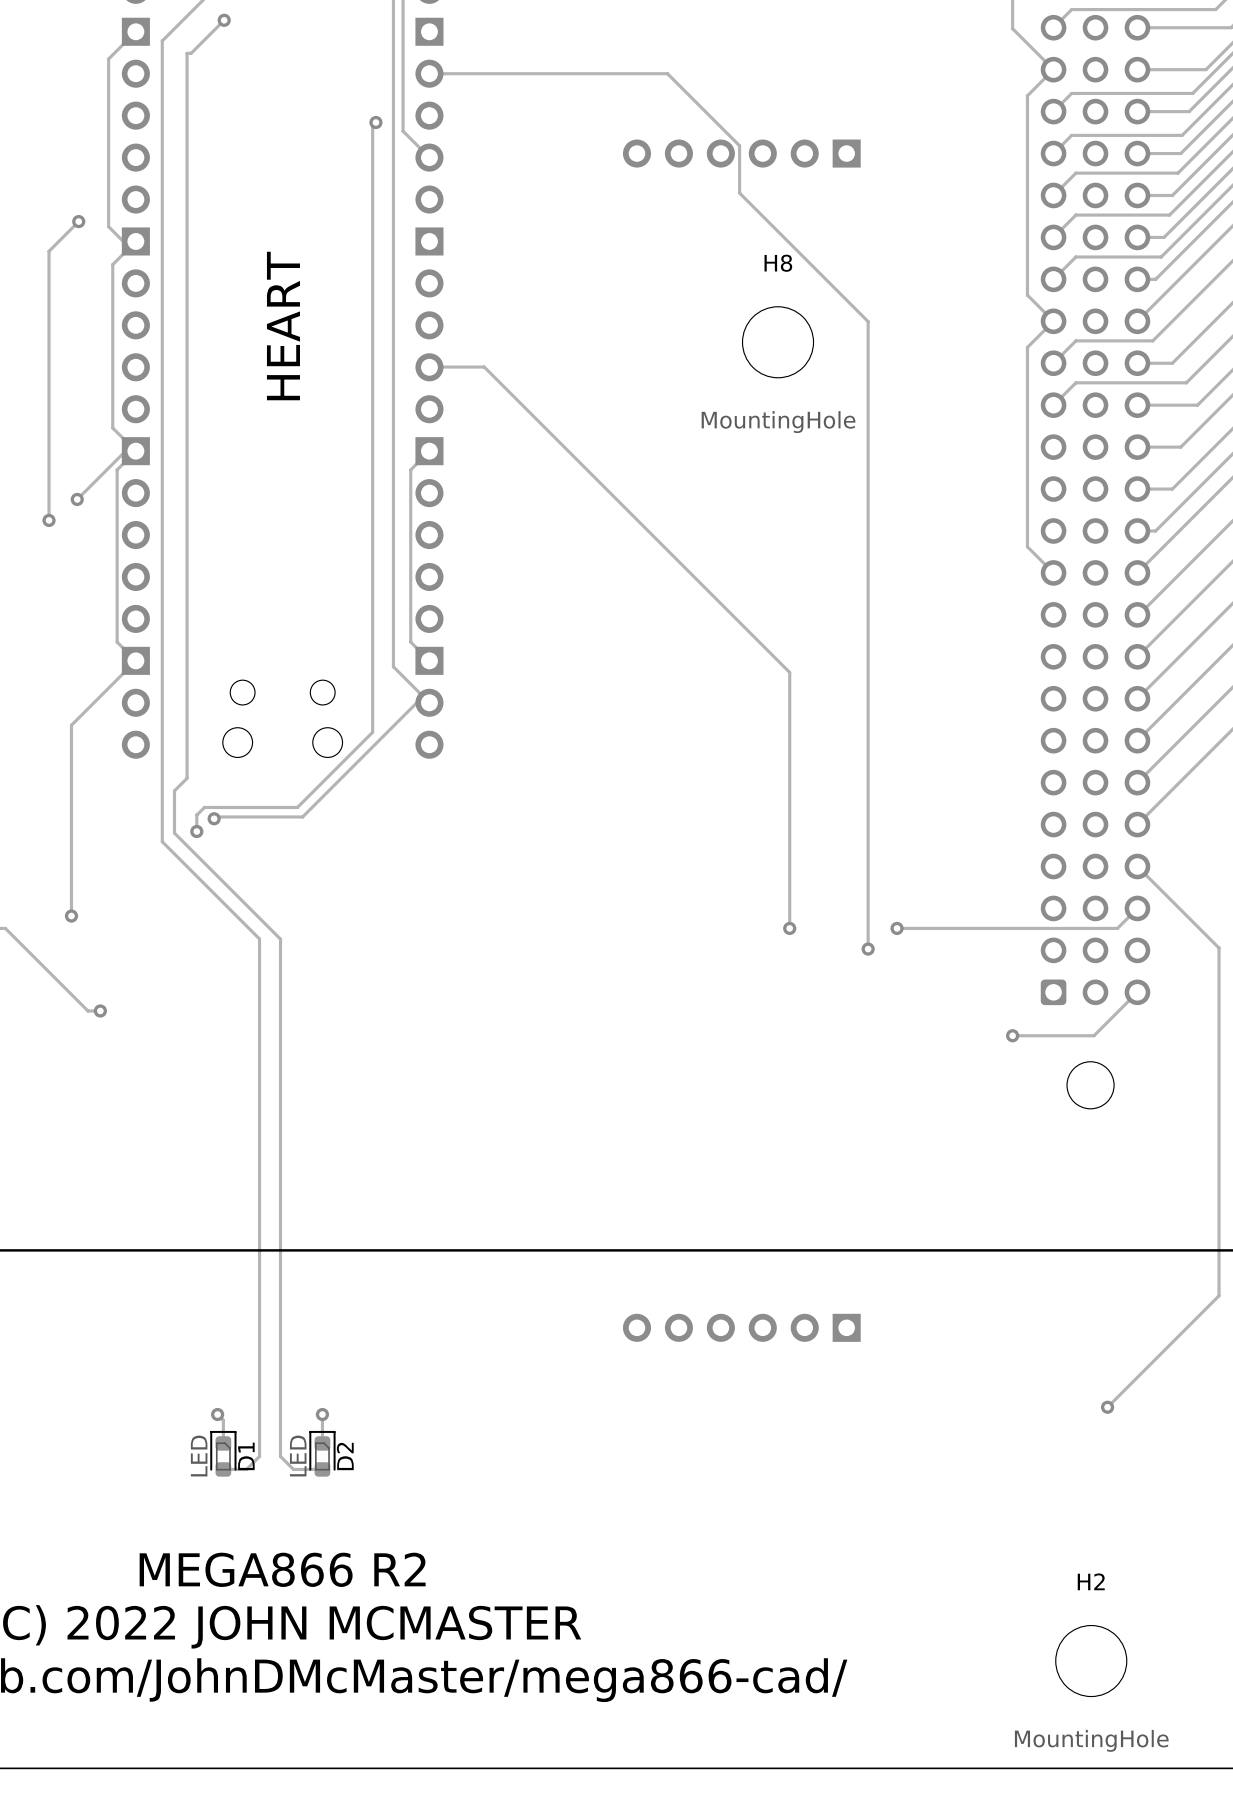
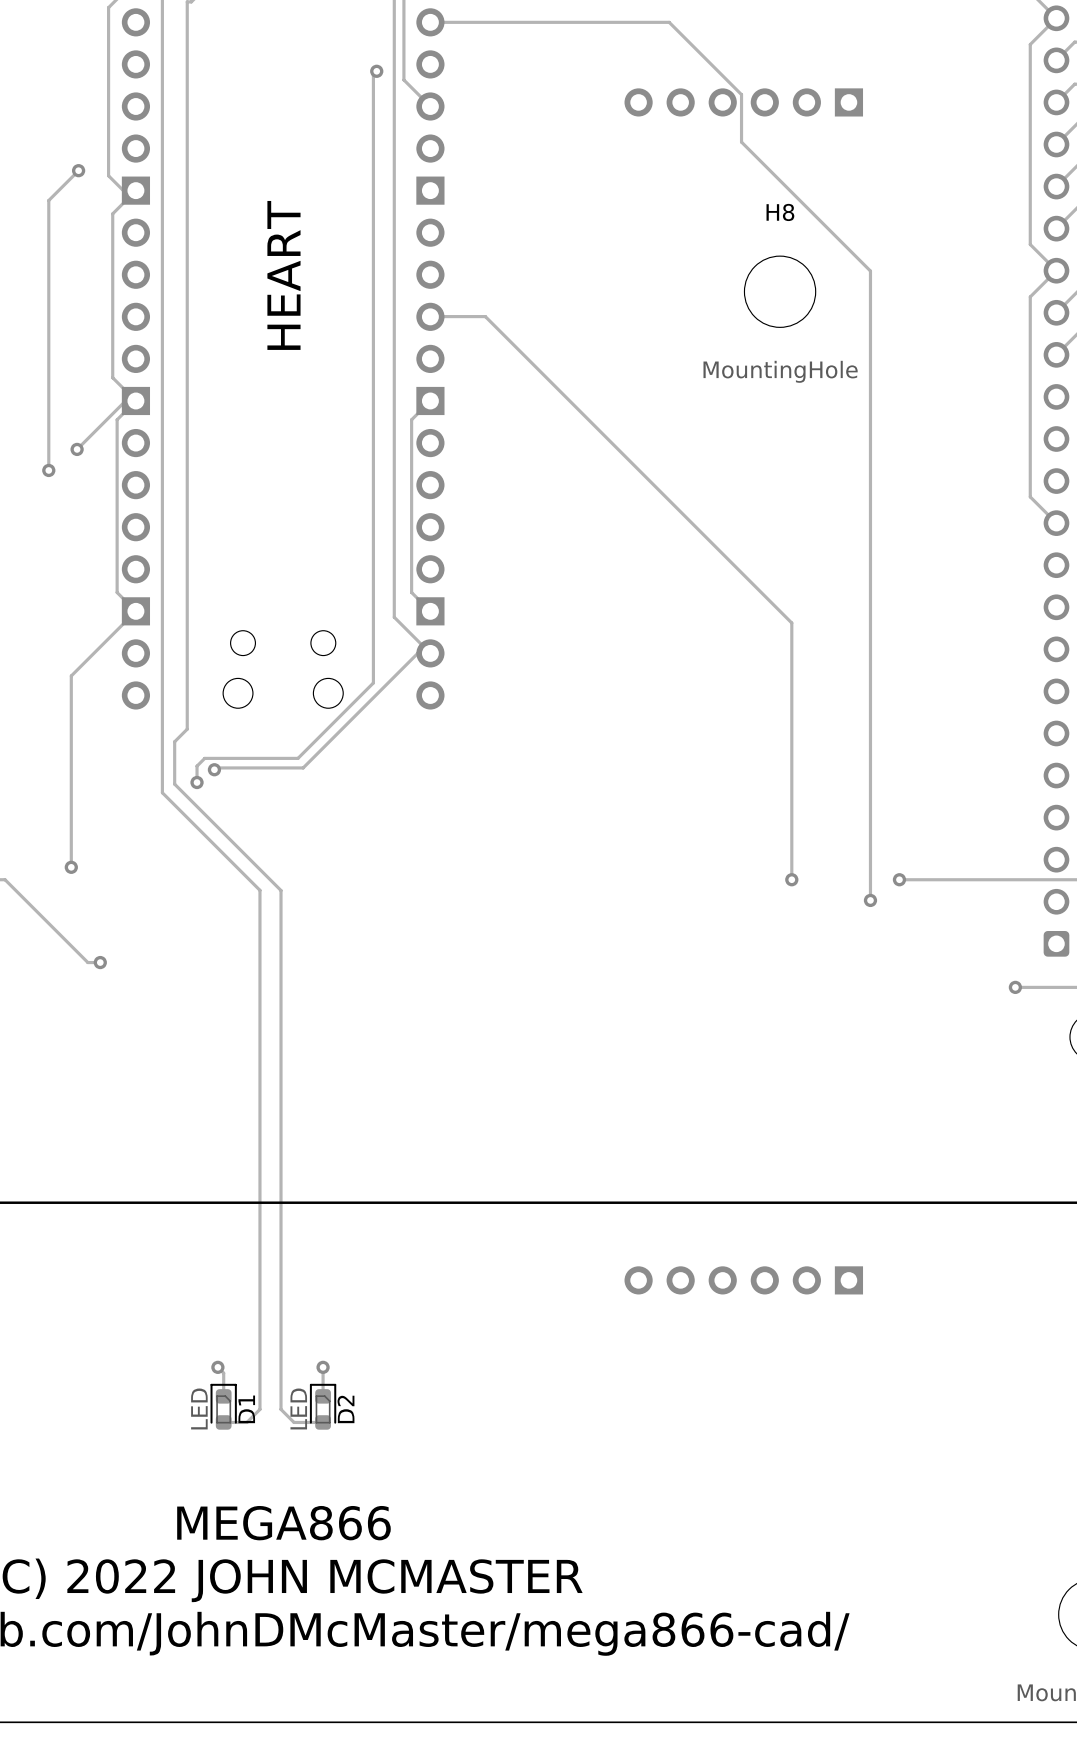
text: MEGA866 R2 (282, 1569) -> MEGA866 (283, 1523)

